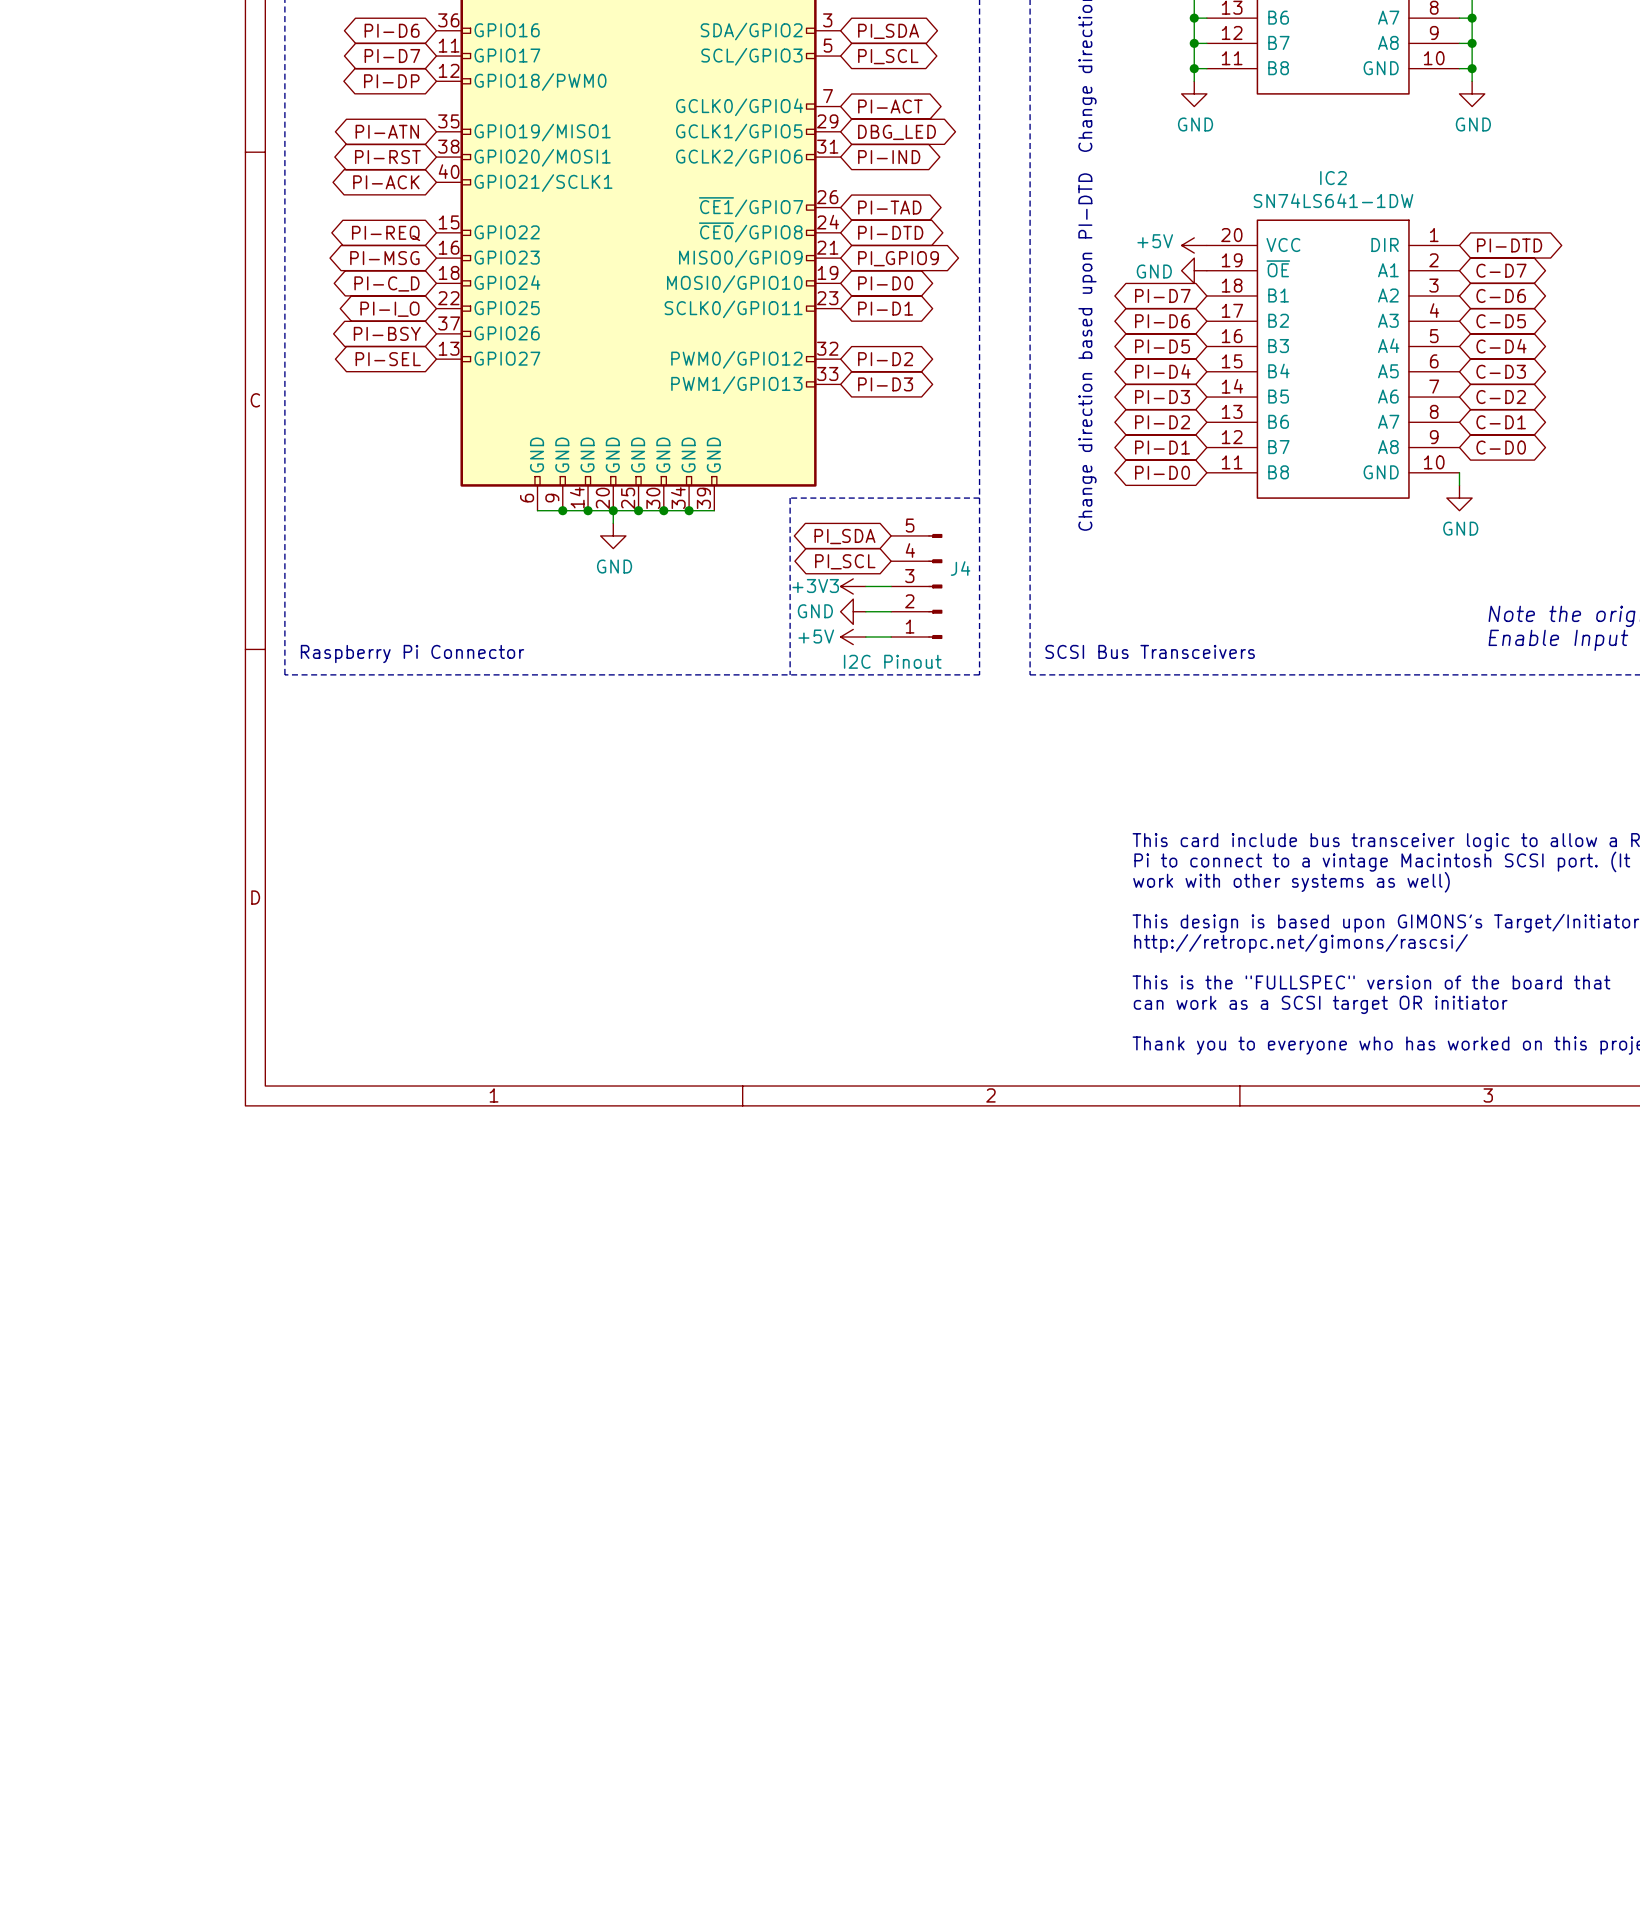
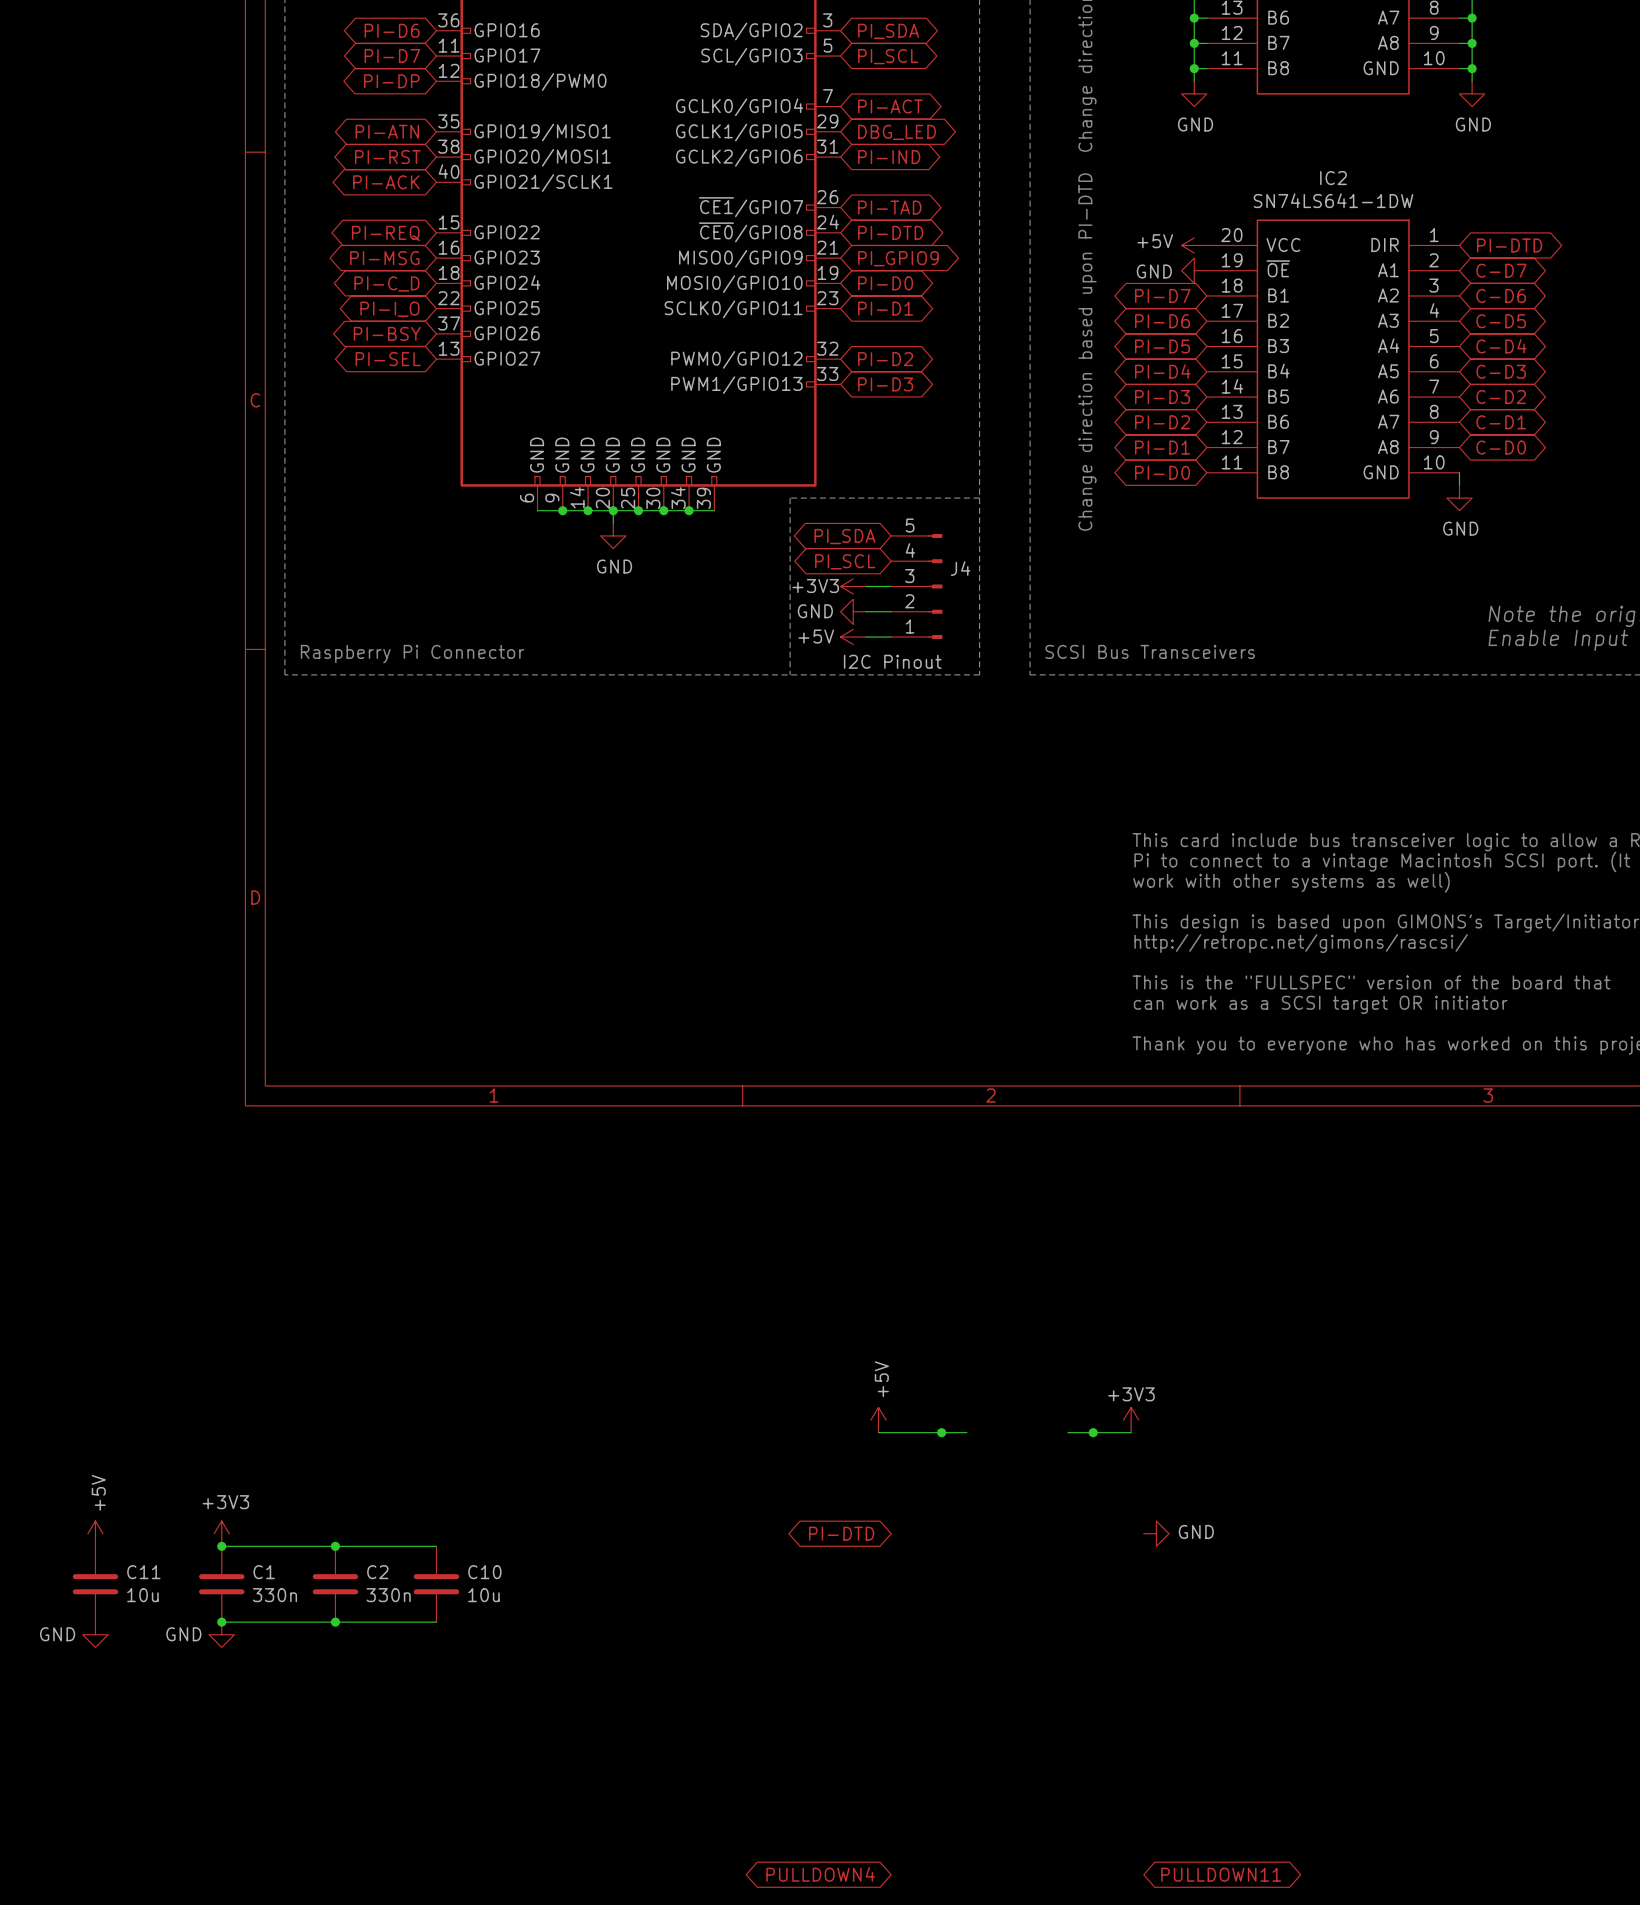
power symbol: none -> +5V (878, 1420)
power symbol: none -> +3V3 (1131, 1420)
wire: none -> (878, 1432) (966, 1432)
junction: none -> (941, 1432)
wire: none -> (1067, 1432) (1131, 1432)
junction: none -> (1093, 1432)
power symbol: none -> +5V (95, 1533)
power symbol: none -> +3V3 (221, 1533)
global label: none -> PI-DTD (841, 1533)
power symbol: none -> GND (1156, 1533)
wire: none -> (221, 1546) (436, 1546)
junction: none -> (221, 1546)
junction: none -> (335, 1546)
C11: none -> 10u (95, 1584)
C1: none -> 330n (221, 1584)
C2: none -> 330n (335, 1584)
C10: none -> 10u (436, 1584)
wire: none -> (221, 1622) (436, 1622)
junction: none -> (221, 1622)
junction: none -> (335, 1622)
power symbol: none -> GND (95, 1634)
power symbol: none -> GND (221, 1634)
global label: none -> PULLDOWN4 (820, 1874)
global label: none -> PULLDOWN11 (1221, 1874)

